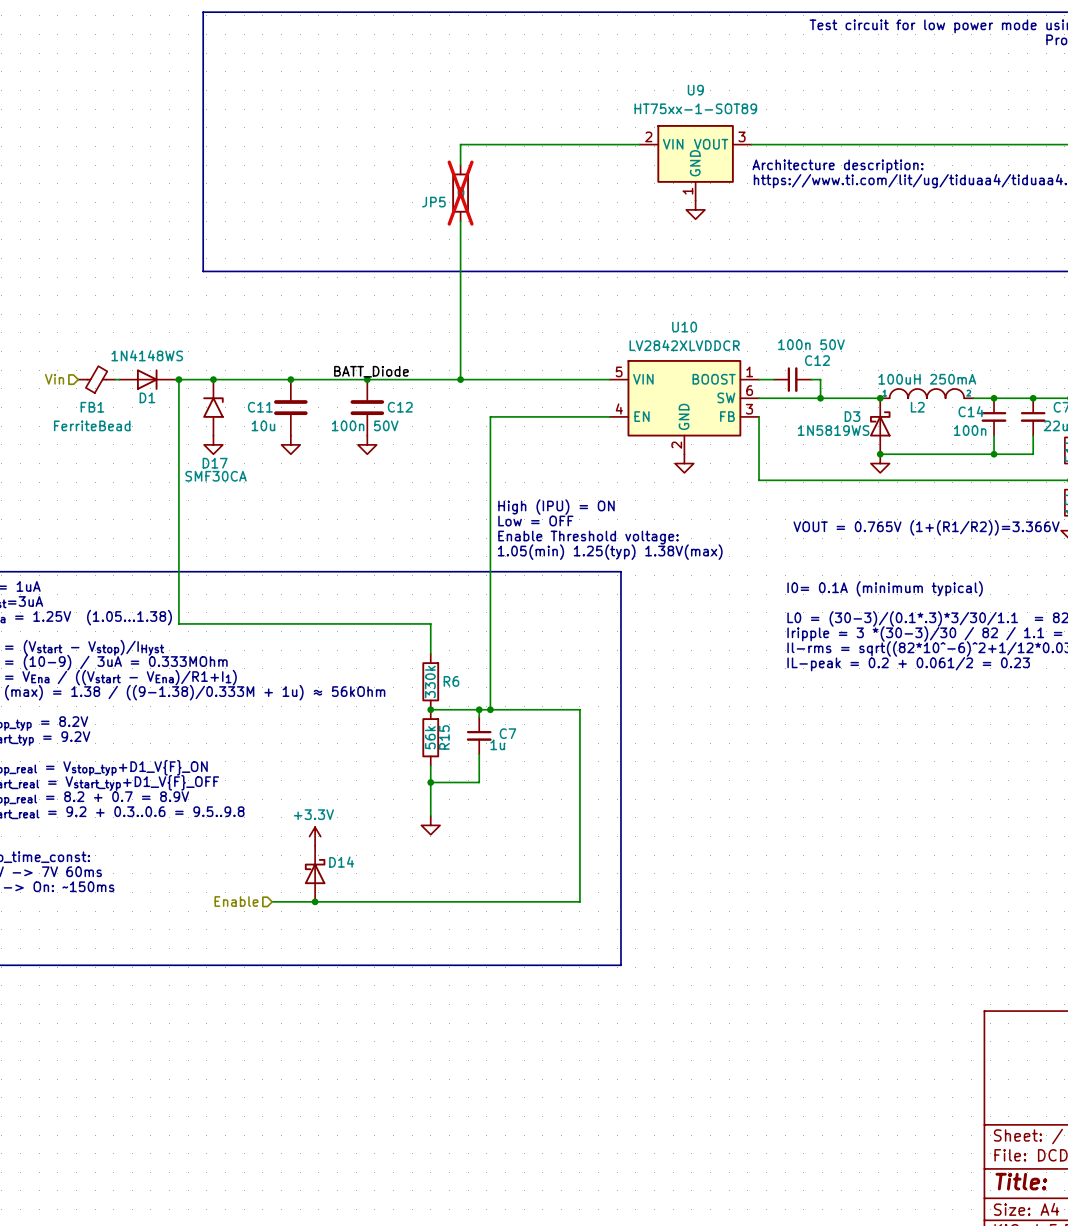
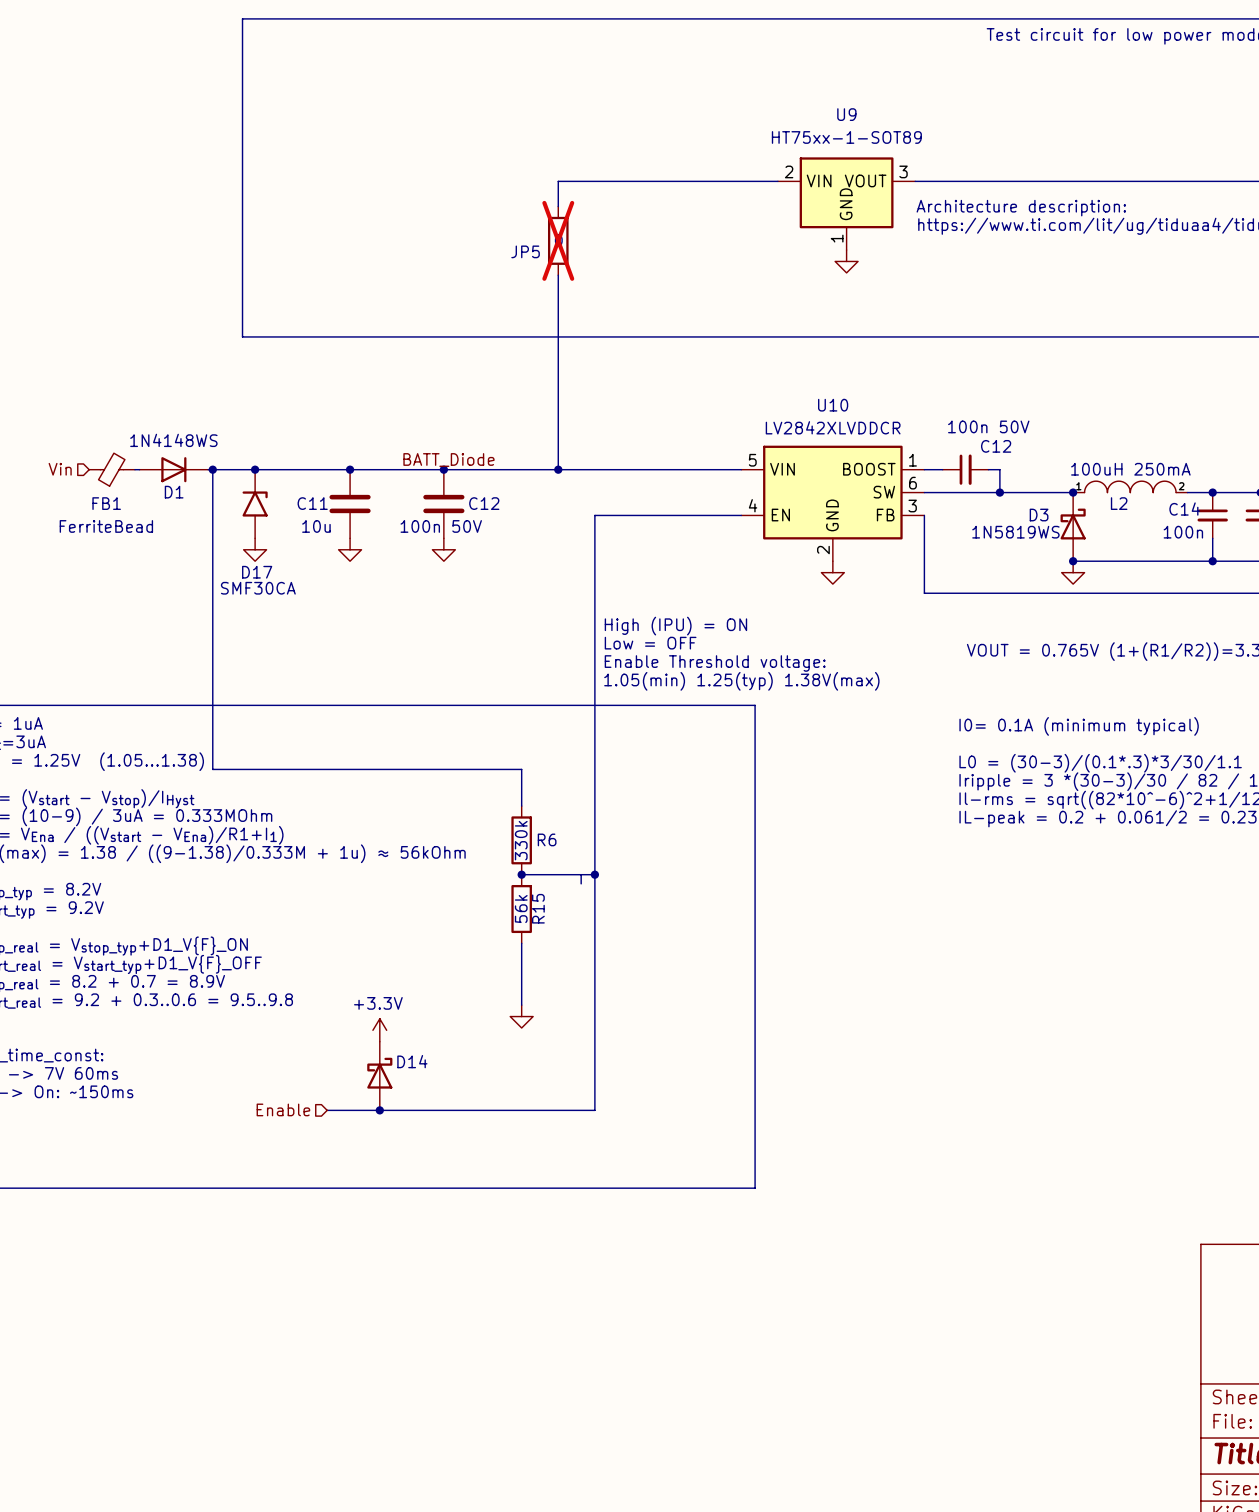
junction: (479, 709) -> none
wire: (490, 709) (579, 709) (579, 901) (490, 901) -> (594, 874) (594, 1110)
C7: 1u (479, 735) -> none
wire: (479, 754) (479, 782) (430, 782) -> none
junction: (430, 782) -> none

